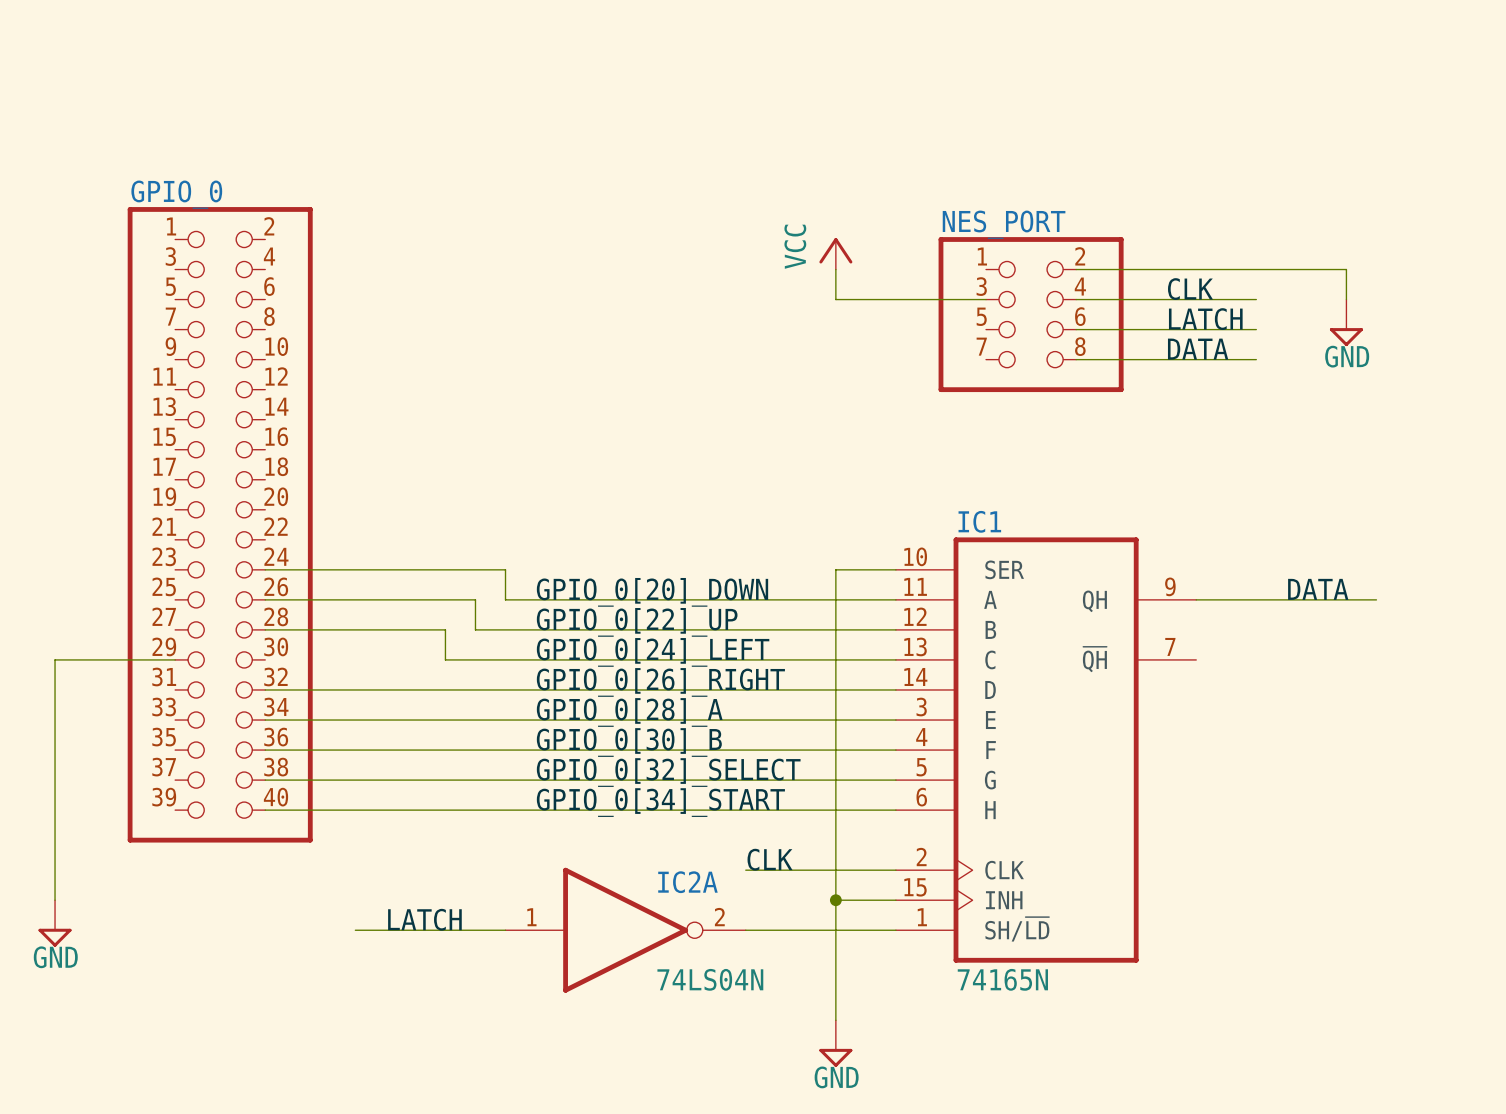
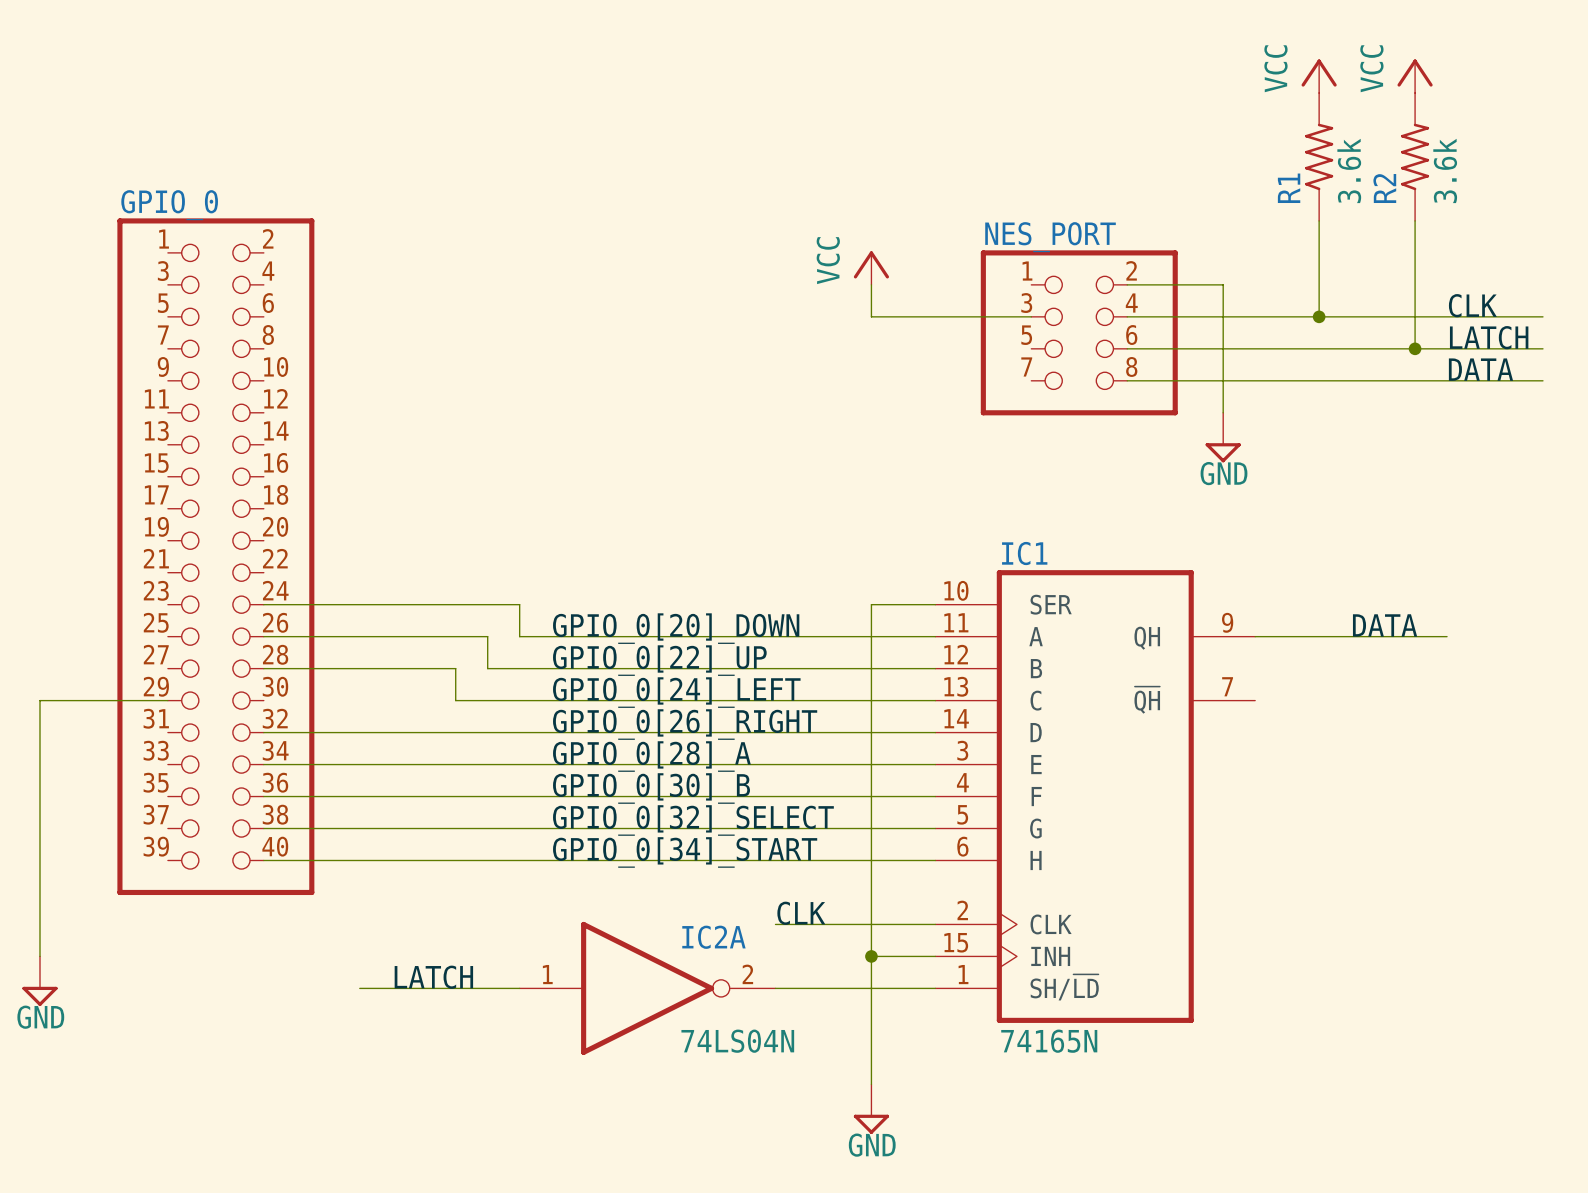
power symbol: none -> VCC (1319, 76)
power symbol: none -> VCC (1415, 76)
R1: none -> 3.6k (1319, 156)
R2: none -> 3.6k (1415, 156)
wire: none -> (1319, 220) (1319, 316) (1542, 316)
wire: (1166, 269) (1346, 269) -> (1415, 220) (1415, 284)
wire: none -> (1223, 284) (1223, 412)
label position: CLK (1190, 289) -> CLK (1472, 305)
junction: none -> (1319, 316)
label position: LATCH (1205, 319) -> LATCH (1489, 337)
power symbol position: GND (1346, 322) -> GND (1223, 437)
wire: none -> (1319, 348) (1542, 348)
junction: none -> (1415, 348)
label position: DATA (1198, 349) -> DATA (1480, 369)
wire: none -> (1319, 380) (1542, 380)

